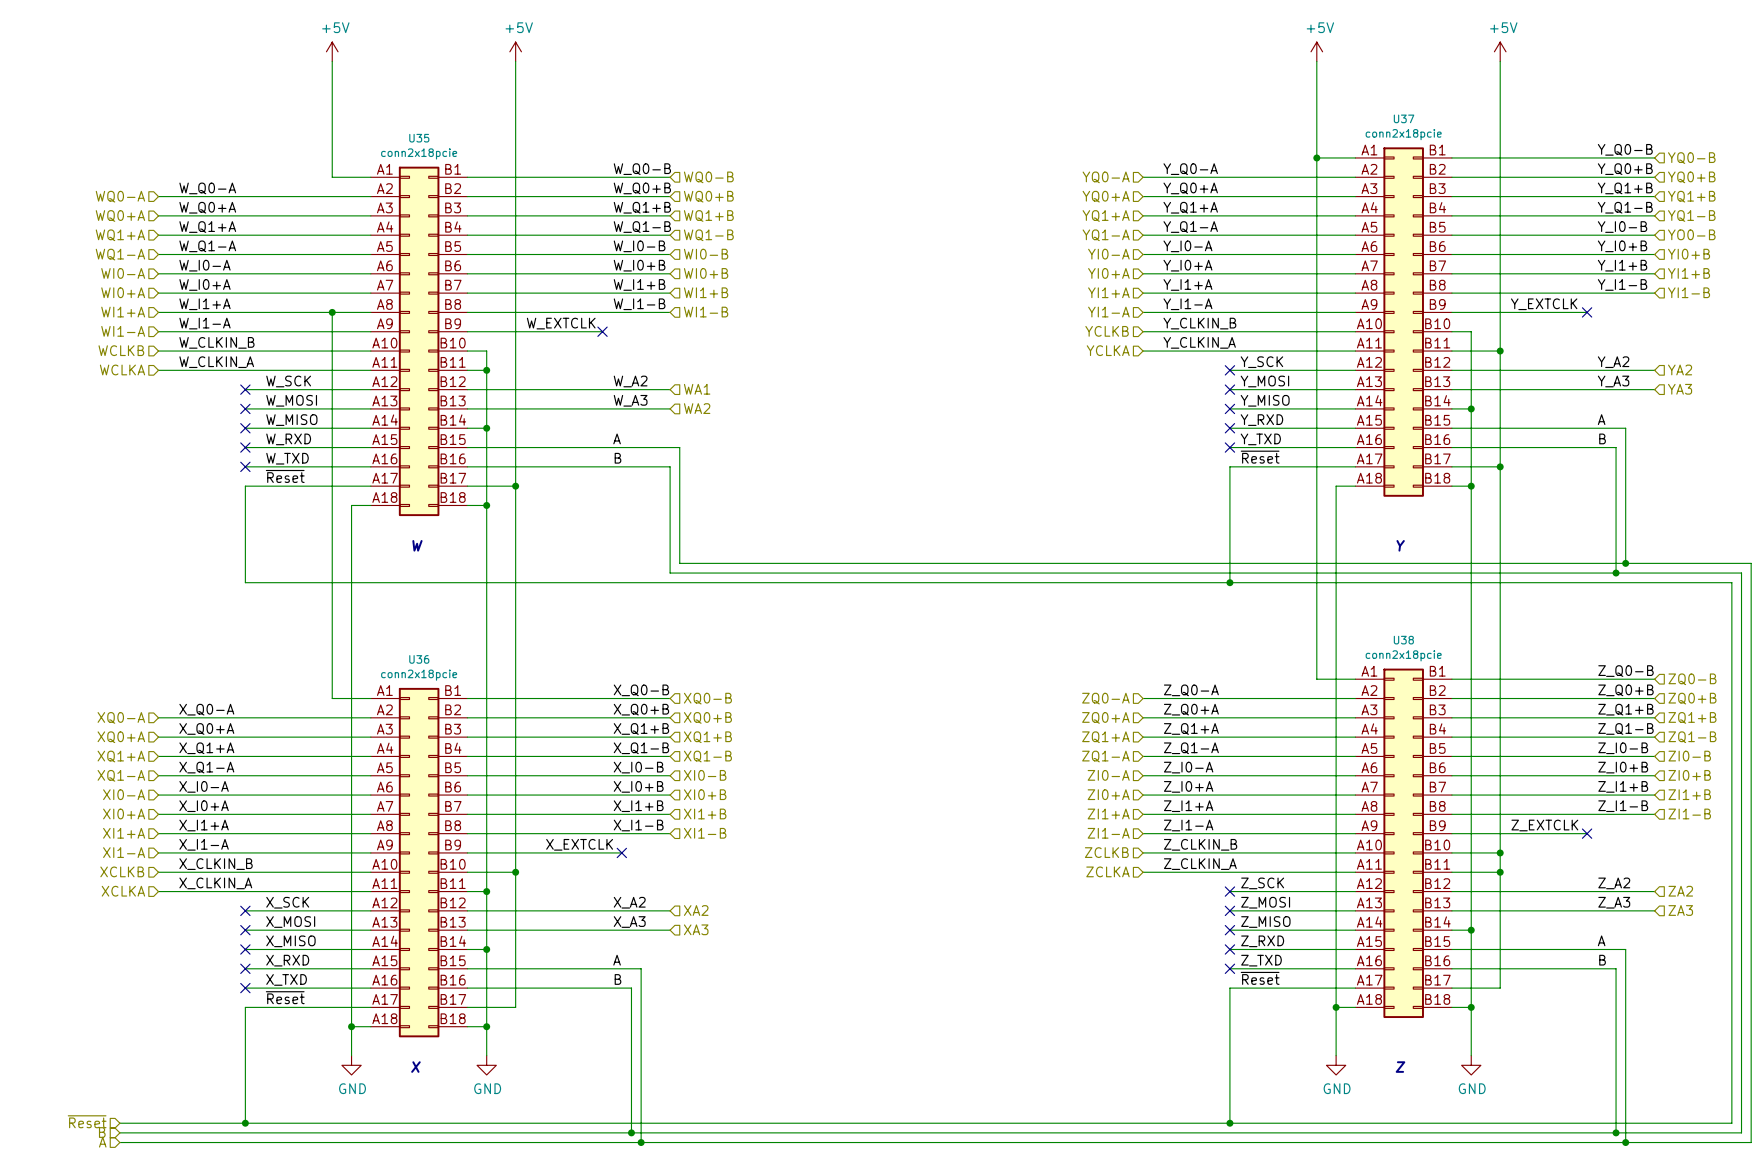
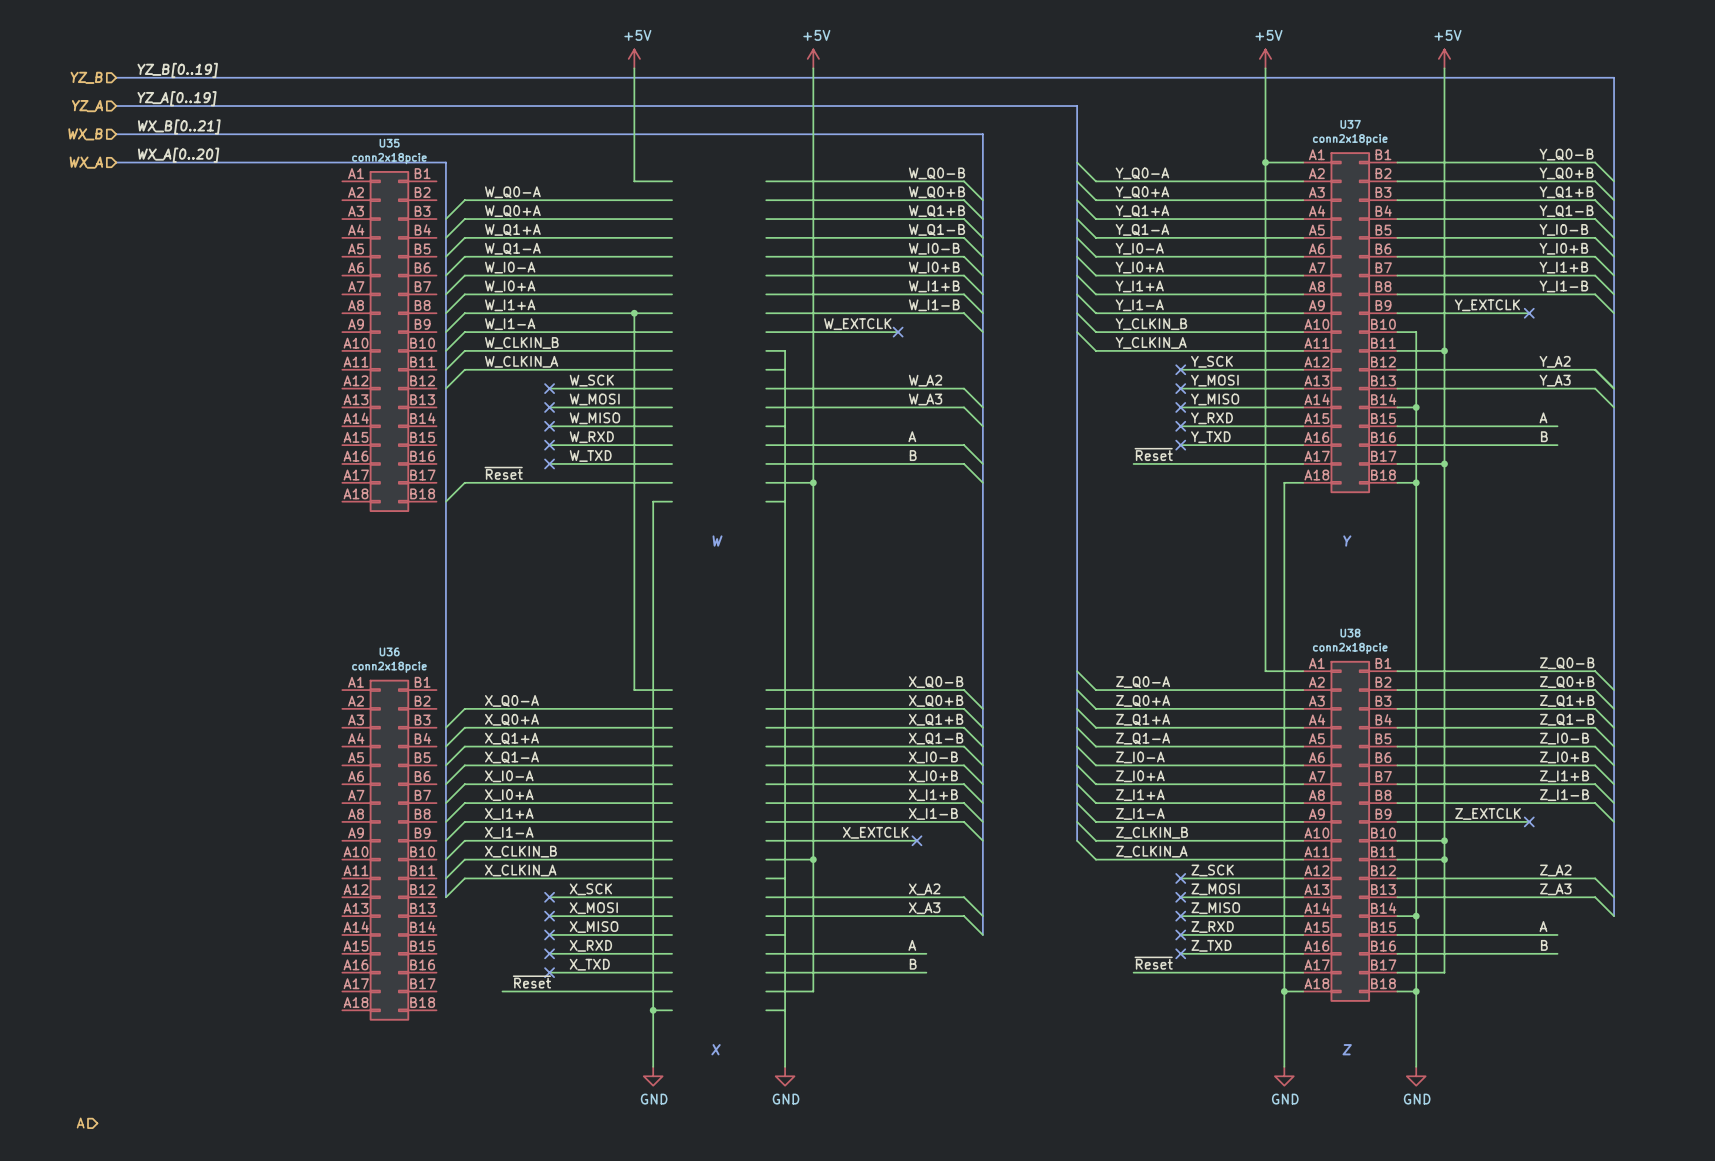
power symbol: +5V (332, 51) -> none
power symbol position: +5V (515, 51) -> +5V (634, 58)
power symbol: none -> +5V (813, 58)
wire: (332, 61) (332, 177) (370, 177) -> none
wire: (515, 61) (515, 1007) (467, 1007) -> none
wire: none -> (634, 68) (634, 181) (672, 181)
wire: none -> (813, 68) (813, 991) (766, 991)
label: none -> YZ_B[0..19] (177, 70)
hierarchical label: none -> YZ_B (86, 77)
bus: none -> (116, 77) (1614, 77) (1614, 916)
label: none -> YZ_A[0..19] (177, 98)
hierarchical label: none -> YZ_A (87, 106)
bus: none -> (116, 106) (1077, 106) (1077, 840)
label: none -> WX_B[0..21] (179, 126)
hierarchical label: none -> WX_B (85, 134)
bus: none -> (116, 134) (982, 134) (982, 934)
label: none -> WX_A[0..20] (178, 155)
bus: none -> (116, 162) (445, 162) (445, 897)
wire: none -> (1077, 162) (1095, 181)
wire: none -> (1595, 162) (1614, 181)
hierarchical label: none -> WX_A (86, 162)
hierarchical label: YQ0-B (1691, 158) -> none
label: W_Q0-B (642, 169) -> none
label: none -> W_Q0-B (936, 173)
wire: (467, 177) (670, 177) -> none
hierarchical label: WQ0-B (708, 177) -> none
wire: none -> (766, 181) (964, 181) (982, 200)
hierarchical label: YQ0-A (1106, 177) -> none
wire: none -> (1077, 181) (1095, 200)
wire: none -> (1595, 181) (1614, 200)
hierarchical label: YQ0+B (1691, 177) -> none
label: W_Q0-A (207, 188) -> none
label: none -> W_Q0-A (512, 192)
label: W_Q0+B (642, 188) -> none
label: none -> W_Q0+B (936, 192)
hierarchical label: WQ0-A (120, 196) -> none
wire: (158, 196) (370, 196) -> none
wire: (467, 196) (496, 196) -> (445, 219) (464, 200)
wire: none -> (634, 200) (672, 200)
hierarchical label: WQ0+B (708, 196) -> none
wire: none -> (766, 200) (964, 200) (982, 219)
hierarchical label: YQ0+A (1106, 196) -> none
wire: none -> (1077, 200) (1095, 219)
wire: none -> (1595, 200) (1614, 219)
hierarchical label: YQ1+B (1691, 196) -> none
label: W_Q0+A (207, 207) -> none
label: none -> W_Q0+A (512, 211)
label: W_Q1+B (642, 207) -> none
label: none -> W_Q1+B (936, 211)
hierarchical label: WQ0+A (120, 215) -> none
wire: (158, 215) (370, 215) -> none
wire: (467, 215) (496, 215) -> (445, 237) (464, 219)
wire: none -> (634, 219) (672, 219)
hierarchical label: WQ1+B (708, 215) -> none
wire: none -> (766, 219) (964, 219) (982, 237)
hierarchical label: YQ1+A (1106, 215) -> none
wire: none -> (1077, 219) (1095, 237)
wire: none -> (1595, 219) (1614, 237)
hierarchical label: YQ1-B (1691, 215) -> none
label: W_Q1+A (207, 227) -> none
label: none -> W_Q1+A (512, 229)
label: W_Q1-B (642, 227) -> none
label: none -> W_Q1-B (936, 229)
hierarchical label: YO0-B (1691, 234) -> none
hierarchical label: WQ1+A (120, 235) -> none
wire: (158, 235) (370, 235) -> none
wire: (467, 235) (496, 235) -> (445, 256) (464, 237)
wire: none -> (634, 237) (672, 237)
hierarchical label: WQ1-B (708, 235) -> none
wire: none -> (766, 237) (964, 237) (982, 256)
hierarchical label: YQ1-A (1106, 235) -> none
wire: none -> (1077, 237) (1095, 256)
wire: none -> (1595, 237) (1614, 256)
label: W_Q1-A (207, 246) -> none
label: none -> W_Q1-A (512, 248)
label: W_I0-B (639, 246) -> none
label: none -> W_I0-B (934, 248)
hierarchical label: WQ1-A (120, 254) -> none
wire: (158, 254) (370, 254) -> none
wire: (467, 254) (496, 254) -> (445, 275) (464, 256)
wire: none -> (634, 256) (672, 256)
hierarchical label: WI0-B (706, 254) -> none
wire: none -> (766, 256) (964, 256) (982, 275)
hierarchical label: YI0-A (1108, 254) -> none
wire: none -> (1077, 256) (1095, 275)
wire: none -> (1595, 256) (1614, 275)
hierarchical label: YI0+B (1689, 254) -> none
label: W_I0-A (205, 265) -> none
label: none -> W_I0-A (510, 267)
label: W_I0+B (639, 265) -> none
label: none -> W_I0+B (934, 267)
hierarchical label: WI0-A (123, 273) -> none
wire: (158, 273) (370, 273) -> none
wire: (467, 273) (496, 273) -> (445, 294) (464, 275)
wire: none -> (634, 275) (672, 275)
hierarchical label: WI0+B (706, 273) -> none
wire: none -> (766, 275) (964, 275) (982, 294)
hierarchical label: YI0+A (1108, 273) -> none
wire: none -> (1077, 275) (1095, 294)
wire: none -> (1595, 275) (1614, 294)
hierarchical label: YI1+B (1689, 273) -> none
label: W_I0+A (205, 284) -> none
label: none -> W_I0+A (510, 286)
label: W_I1+B (639, 284) -> none
label: none -> W_I1+B (934, 286)
hierarchical label: WI0+A (123, 292) -> none
hierarchical label: WI1+B (706, 292) -> none
hierarchical label: YI1+A (1108, 292) -> none
hierarchical label: YI1-B (1689, 292) -> none
wire: (158, 293) (370, 293) -> none
wire: (467, 293) (496, 293) -> (445, 313) (464, 294)
wire: none -> (634, 294) (672, 294)
wire: none -> (766, 294) (964, 294) (982, 313)
wire: none -> (1077, 294) (1095, 313)
wire: none -> (1595, 294) (1614, 313)
label: W_I1+A (205, 304) -> none
label: none -> W_I1+A (510, 305)
label: W_I1-B (639, 304) -> none
label: none -> W_I1-B (934, 305)
hierarchical label: WI1+A (123, 312) -> none
wire: (158, 312) (370, 312) -> none
wire: (332, 312) (332, 698) (370, 698) -> none
junction: (332, 312) -> none
wire: (467, 312) (496, 312) -> (445, 332) (464, 313)
junction: none -> (634, 313)
hierarchical label: WI1-B (706, 312) -> none
wire: none -> (672, 313) (634, 313) (634, 463) (672, 463)
wire: none -> (766, 313) (964, 313) (982, 332)
hierarchical label: YI1-A (1108, 312) -> none
wire: none -> (1077, 313) (1095, 332)
label: W_I1-A (205, 323) -> none
label: none -> W_I1-A (510, 324)
label: W_EXTCLK (561, 323) -> none
label: none -> W_EXTCLK (857, 324)
hierarchical label: WI1-A (123, 331) -> none
wire: (158, 331) (370, 331) -> none
wire: (467, 331) (496, 331) -> (445, 350) (464, 332)
wire: none -> (568, 332) (672, 332)
no-connect mark: (602, 331) -> none
wire: none -> (766, 332) (898, 332)
no-connect mark: none -> (898, 332)
hierarchical label: YCLKB (1107, 331) -> none
wire: none -> (1077, 332) (1095, 350)
label: W_CLKIN_B (216, 342) -> none
label: none -> W_CLKIN_B (521, 342)
hierarchical label: WCLKB (121, 350) -> none
hierarchical label: YCLKA (1108, 350) -> none
wire: (158, 351) (370, 351) -> none
wire: (467, 351) (486, 351) (486, 1055) -> none
wire: none -> (672, 350) (464, 350) (445, 369)
wire: none -> (766, 350) (785, 350) (785, 1066)
label: W_CLKIN_A (216, 362) -> none
label: none -> W_CLKIN_A (521, 361)
hierarchical label: WCLKA (122, 369) -> none
hierarchical label: YA2 (1680, 369) -> none
wire: (158, 370) (370, 370) -> none
wire: (467, 370) (486, 370) -> none
junction: (486, 370) -> none
wire: none -> (672, 369) (464, 369) (445, 388)
wire: none -> (766, 369) (785, 369)
wire: none -> (1595, 369) (1614, 388)
label: W_SCK (288, 381) -> none
label: none -> W_SCK (591, 380)
label: W_A2 (630, 381) -> none
label: none -> W_A2 (925, 380)
wire: (245, 389) (370, 389) -> none
no-connect mark: (245, 389) -> none
wire: (467, 389) (583, 389) -> none
no-connect mark: none -> (549, 388)
wire: none -> (634, 388) (672, 388)
hierarchical label: WA1 (697, 389) -> none
wire: none -> (766, 388) (964, 388) (982, 407)
wire: none -> (1595, 388) (1614, 407)
hierarchical label: YA3 (1680, 389) -> none
label: W_MOSI (291, 400) -> none
label: none -> W_MOSI (594, 399)
label: W_A3 (630, 400) -> none
label: none -> W_A3 (925, 399)
wire: (245, 408) (370, 408) -> none
no-connect mark: (245, 408) -> none
wire: (467, 408) (583, 408) -> none
no-connect mark: none -> (549, 407)
wire: none -> (634, 407) (672, 407)
hierarchical label: WA2 (697, 408) -> none
wire: none -> (766, 407) (964, 407) (982, 426)
label: W_MISO (291, 420) -> none
label: none -> W_MISO (594, 418)
wire: (245, 428) (370, 428) -> none
no-connect mark: (245, 428) -> none
wire: (467, 428) (486, 428) -> none
junction: (486, 428) -> none
wire: none -> (549, 426) (672, 426)
no-connect mark: none -> (549, 426)
wire: none -> (766, 426) (785, 426)
wire: (1616, 428) (1625, 428) (1625, 563) -> none
label: A (617, 438) -> none
label: none -> A (912, 436)
label: W_RXD (288, 439) -> none
label: none -> W_RXD (591, 437)
wire: (245, 447) (370, 447) -> none
no-connect mark: (245, 447) -> none
wire: (467, 447) (583, 447) -> none
no-connect mark: none -> (549, 445)
wire: (679, 447) (679, 563) (1751, 563) (1751, 1142) (119, 1142) -> (643, 445) (672, 445)
wire: none -> (766, 445) (964, 445) (982, 463)
wire: (1616, 447) (1616, 573) -> none
label position: ~{Reset} (1260, 457) -> ~{Reset} (1153, 454)
label: W_TXD (287, 458) -> none
label: B (617, 458) -> none
label: none -> W_TXD (590, 456)
label: none -> B (913, 455)
wire: (245, 466) (370, 466) -> none
no-connect mark: (245, 466) -> none
wire: (467, 466) (583, 466) -> none
no-connect mark: none -> (549, 463)
wire: none -> (766, 463) (964, 463) (982, 482)
wire: (1229, 466) (1229, 582) -> (1180, 463) (1133, 463)
label: ~{Reset} (285, 476) -> none
label: none -> ~{Reset} (503, 473)
wire: (370, 486) (245, 486) (245, 582) (1731, 582) (1731, 1123) (119, 1123) -> none
wire: (467, 486) (496, 486) -> (445, 501) (464, 482)
wire: none -> (483, 482) (672, 482)
junction: (515, 486) -> none
wire: none -> (766, 482) (813, 482)
junction: none -> (813, 482)
wire: (370, 505) (351, 505) (351, 1055) -> none
wire: (467, 505) (486, 505) -> none
junction: (486, 505) -> none
wire: none -> (672, 501) (653, 501) (653, 1066)
wire: none -> (766, 501) (785, 501)
text: W (417, 545) -> none
text: none -> W (717, 541)
junction: (1625, 563) -> none
wire: (670, 573) (1741, 573) (1741, 1132) (119, 1132) -> (634, 567) (634, 690) (672, 690)
junction: (1616, 573) -> none
junction: (1229, 582) -> none
wire: none -> (1077, 671) (1095, 690)
wire: none -> (1595, 671) (1614, 690)
hierarchical label: ZQ0-B (1692, 679) -> none
label: X_Q0-B (641, 690) -> none
label: none -> X_Q0-B (936, 682)
wire: (467, 698) (670, 698) -> none
hierarchical label: XQ0-B (707, 698) -> none
wire: none -> (766, 690) (964, 690) (982, 708)
hierarchical label: ZQ0-A (1105, 698) -> none
wire: none -> (1077, 690) (1095, 708)
wire: none -> (1595, 690) (1614, 708)
hierarchical label: ZQ0+B (1692, 698) -> none
label: X_Q0-A (206, 709) -> none
label: none -> X_Q0-A (511, 700)
label: X_Q0+B (641, 709) -> none
label: none -> X_Q0+B (936, 700)
hierarchical label: XQ0-A (121, 717) -> none
wire: (158, 717) (370, 717) -> none
wire: (467, 717) (496, 717) -> (445, 727) (464, 708)
wire: none -> (634, 708) (672, 708)
hierarchical label: XQ0+B (707, 717) -> none
wire: none -> (766, 708) (964, 708) (982, 727)
hierarchical label: ZQ0+A (1105, 717) -> none
wire: none -> (1077, 708) (1095, 727)
wire: none -> (1595, 708) (1614, 727)
hierarchical label: ZQ1+B (1692, 717) -> none
label: X_Q0+A (206, 728) -> none
label: none -> X_Q0+A (511, 719)
label: X_Q1+B (641, 728) -> none
label: none -> X_Q1+B (936, 719)
hierarchical label: XQ0+A (121, 737) -> none
wire: (158, 737) (370, 737) -> none
wire: (467, 737) (496, 737) -> (445, 746) (464, 727)
wire: none -> (634, 727) (672, 727)
hierarchical label: XQ1+B (707, 737) -> none
wire: none -> (766, 727) (964, 727) (982, 746)
hierarchical label: ZQ1+A (1105, 737) -> none
wire: none -> (1077, 727) (1095, 746)
wire: none -> (1595, 727) (1614, 746)
hierarchical label: ZQ1-B (1692, 737) -> none
label: X_Q1+A (206, 748) -> none
label: none -> X_Q1+A (511, 738)
label: X_Q1-B (641, 748) -> none
label: none -> X_Q1-B (936, 738)
hierarchical label: XQ1+A (121, 756) -> none
wire: (158, 756) (370, 756) -> none
wire: (467, 756) (496, 756) -> (445, 765) (464, 746)
wire: none -> (634, 746) (672, 746)
hierarchical label: XQ1-B (707, 756) -> none
wire: none -> (766, 746) (964, 746) (982, 765)
hierarchical label: ZQ1-A (1105, 756) -> none
wire: none -> (1077, 746) (1095, 765)
wire: none -> (1595, 746) (1614, 765)
hierarchical label: ZI0-B (1689, 756) -> none
label: X_Q1-A (206, 767) -> none
label: none -> X_Q1-A (511, 757)
label: X_I0-B (638, 767) -> none
label: none -> X_I0-B (933, 757)
hierarchical label: XQ1-A (121, 775) -> none
wire: (158, 775) (370, 775) -> none
wire: (467, 775) (496, 775) -> (445, 784) (464, 765)
wire: none -> (634, 765) (672, 765)
hierarchical label: XI0-B (705, 775) -> none
wire: none -> (766, 765) (964, 765) (982, 784)
hierarchical label: ZI0-A (1108, 775) -> none
wire: none -> (1077, 765) (1095, 784)
wire: none -> (1595, 765) (1614, 784)
hierarchical label: ZI0+B (1689, 775) -> none
label: X_I0-A (204, 786) -> none
label: none -> X_I0-A (509, 776)
label: X_I0+B (638, 786) -> none
label: none -> X_I0+B (933, 776)
hierarchical label: XI0-A (124, 794) -> none
hierarchical label: XI0+B (705, 794) -> none
hierarchical label: ZI0+A (1108, 794) -> none
hierarchical label: ZI1+B (1689, 794) -> none
wire: (158, 795) (370, 795) -> none
wire: (467, 795) (496, 795) -> (445, 803) (464, 784)
wire: none -> (634, 784) (672, 784)
wire: none -> (766, 784) (964, 784) (982, 803)
wire: none -> (1077, 784) (1095, 803)
wire: none -> (1595, 784) (1614, 803)
label: X_I0+A (204, 806) -> none
label: none -> X_I0+A (509, 795)
label: X_I1+B (638, 806) -> none
label: none -> X_I1+B (933, 795)
hierarchical label: XI0+A (124, 813) -> none
hierarchical label: XI1+B (705, 813) -> none
hierarchical label: ZI1+A (1108, 813) -> none
hierarchical label: ZI1-B (1689, 813) -> none
wire: (158, 814) (370, 814) -> none
wire: (467, 814) (496, 814) -> (445, 821) (464, 803)
wire: none -> (634, 803) (672, 803)
wire: none -> (766, 803) (964, 803) (982, 821)
wire: none -> (1077, 803) (1095, 821)
wire: none -> (1595, 803) (1614, 821)
label: X_I1+A (204, 825) -> none
label: none -> X_I1+A (509, 813)
label: X_I1-B (638, 825) -> none
label: none -> X_I1-B (933, 813)
hierarchical label: XI1+A (124, 833) -> none
wire: (158, 833) (370, 833) -> none
wire: (467, 833) (496, 833) -> (445, 840) (464, 821)
wire: none -> (634, 821) (672, 821)
hierarchical label: XI1-B (705, 833) -> none
wire: none -> (766, 821) (964, 821) (982, 840)
hierarchical label: ZI1-A (1108, 833) -> none
wire: none -> (1077, 821) (1095, 840)
label: X_I1-A (204, 844) -> none
label: none -> X_I1-A (509, 832)
label: X_EXTCLK (579, 844) -> none
label: none -> X_EXTCLK (875, 832)
hierarchical label: XI1-A (124, 852) -> none
wire: (158, 852) (370, 852) -> none
wire: (467, 852) (496, 852) -> (445, 859) (464, 840)
wire: none -> (587, 840) (672, 840)
no-connect mark: (621, 852) -> none
wire: none -> (766, 840) (916, 840)
no-connect mark: none -> (916, 840)
hierarchical label: ZCLKB (1106, 852) -> none
wire: none -> (1077, 840) (1095, 859)
label: X_CLKIN_B (216, 864) -> none
label: none -> X_CLKIN_B (520, 851)
hierarchical label: XCLKB (122, 871) -> none
hierarchical label: ZCLKA (1107, 871) -> none
wire: (158, 872) (370, 872) -> none
wire: (467, 872) (496, 872) -> (445, 878) (464, 859)
wire: none -> (483, 859) (672, 859)
junction: (515, 872) -> none
wire: none -> (766, 859) (813, 859)
junction: none -> (813, 859)
label: X_CLKIN_A (215, 883) -> none
label: none -> X_CLKIN_A (520, 870)
hierarchical label: XCLKA (123, 891) -> none
wire: (158, 891) (370, 891) -> none
wire: (467, 891) (486, 891) -> none
junction: (486, 891) -> none
wire: none -> (672, 878) (464, 878) (445, 897)
wire: none -> (766, 878) (785, 878)
wire: none -> (1595, 878) (1614, 897)
hierarchical label: ZA2 (1680, 891) -> none
label: X_SCK (287, 902) -> none
label: none -> X_SCK (590, 889)
label: X_A2 (629, 902) -> none
label: none -> X_A2 (924, 889)
wire: (245, 910) (370, 910) -> none
no-connect mark: (245, 910) -> none
wire: (467, 910) (583, 910) -> none
no-connect mark: none -> (549, 897)
wire: none -> (634, 897) (672, 897)
hierarchical label: XA2 (696, 910) -> none
wire: none -> (766, 897) (964, 897) (982, 916)
wire: none -> (1595, 897) (1614, 916)
hierarchical label: ZA3 (1680, 910) -> none
label: X_MOSI (290, 922) -> none
label: none -> X_MOSI (593, 908)
label: X_A3 (629, 922) -> none
label: none -> X_A3 (924, 908)
hierarchical label: XA3 (696, 929) -> none
wire: (245, 930) (370, 930) -> none
no-connect mark: (245, 930) -> none
wire: (467, 930) (583, 930) -> none
no-connect mark: none -> (549, 916)
wire: none -> (634, 916) (672, 916)
wire: none -> (766, 916) (964, 916) (982, 934)
label: X_MISO (290, 941) -> none
label: none -> X_MISO (594, 927)
wire: (245, 949) (370, 949) -> none
no-connect mark: (245, 949) -> none
wire: (467, 949) (486, 949) -> none
junction: (486, 949) -> none
wire: none -> (549, 934) (672, 934)
no-connect mark: none -> (549, 934)
wire: none -> (766, 934) (785, 934)
wire: (1616, 949) (1625, 949) (1625, 1142) -> none
label: X_RXD (287, 960) -> none
label: A (617, 960) -> none
label: none -> X_RXD (590, 945)
label: none -> A (912, 945)
wire: (245, 968) (370, 968) -> none
no-connect mark: (245, 968) -> none
wire: (467, 968) (583, 968) -> none
no-connect mark: none -> (549, 953)
wire: (641, 968) (641, 1142) -> (606, 953) (672, 953)
wire: none -> (766, 953) (926, 953)
wire: (1616, 968) (1616, 1132) -> none
label position: ~{Reset} (1260, 978) -> ~{Reset} (1153, 963)
label: X_TXD (286, 979) -> none
label: B (617, 979) -> none
label: none -> X_TXD (589, 964)
label: none -> B (913, 964)
wire: (245, 988) (370, 988) -> none
no-connect mark: (245, 988) -> none
wire: (467, 988) (583, 988) -> none
no-connect mark: none -> (549, 972)
wire: (631, 988) (631, 1132) -> (596, 972) (672, 972)
wire: none -> (766, 972) (926, 972)
wire: (1229, 988) (1229, 1123) -> (1180, 972) (1133, 972)
label: ~{Reset} (285, 997) -> none
label: none -> ~{Reset} (531, 982)
wire: (370, 1007) (245, 1007) (245, 1123) -> none
wire: none -> (502, 991) (672, 991)
wire: (351, 1026) (370, 1026) -> none
junction: (351, 1026) -> none
wire: (467, 1026) (486, 1026) -> none
junction: (486, 1026) -> none
wire: none -> (653, 1010) (672, 1010)
junction: none -> (653, 1010)
wire: none -> (766, 1010) (785, 1010)
wire: none -> (1284, 1038) (1284, 1066)
wire: none -> (1416, 1038) (1416, 1066)
power symbol: GND (351, 1065) -> none
power symbol: GND (486, 1065) -> none
power symbol position: GND (1336, 1065) -> GND (1284, 1076)
power symbol position: GND (1471, 1065) -> GND (1416, 1076)
text: X (415, 1067) -> none
text: none -> X (716, 1049)
power symbol: none -> GND (653, 1076)
power symbol: none -> GND (785, 1076)
hierarchical label: ~{Reset} (87, 1121) -> none
junction: (245, 1123) -> none
junction: (1229, 1123) -> none
hierarchical label: B (102, 1132) -> none
junction: (631, 1132) -> none
junction: (1616, 1132) -> none
junction: (641, 1142) -> none
junction: (1625, 1142) -> none

